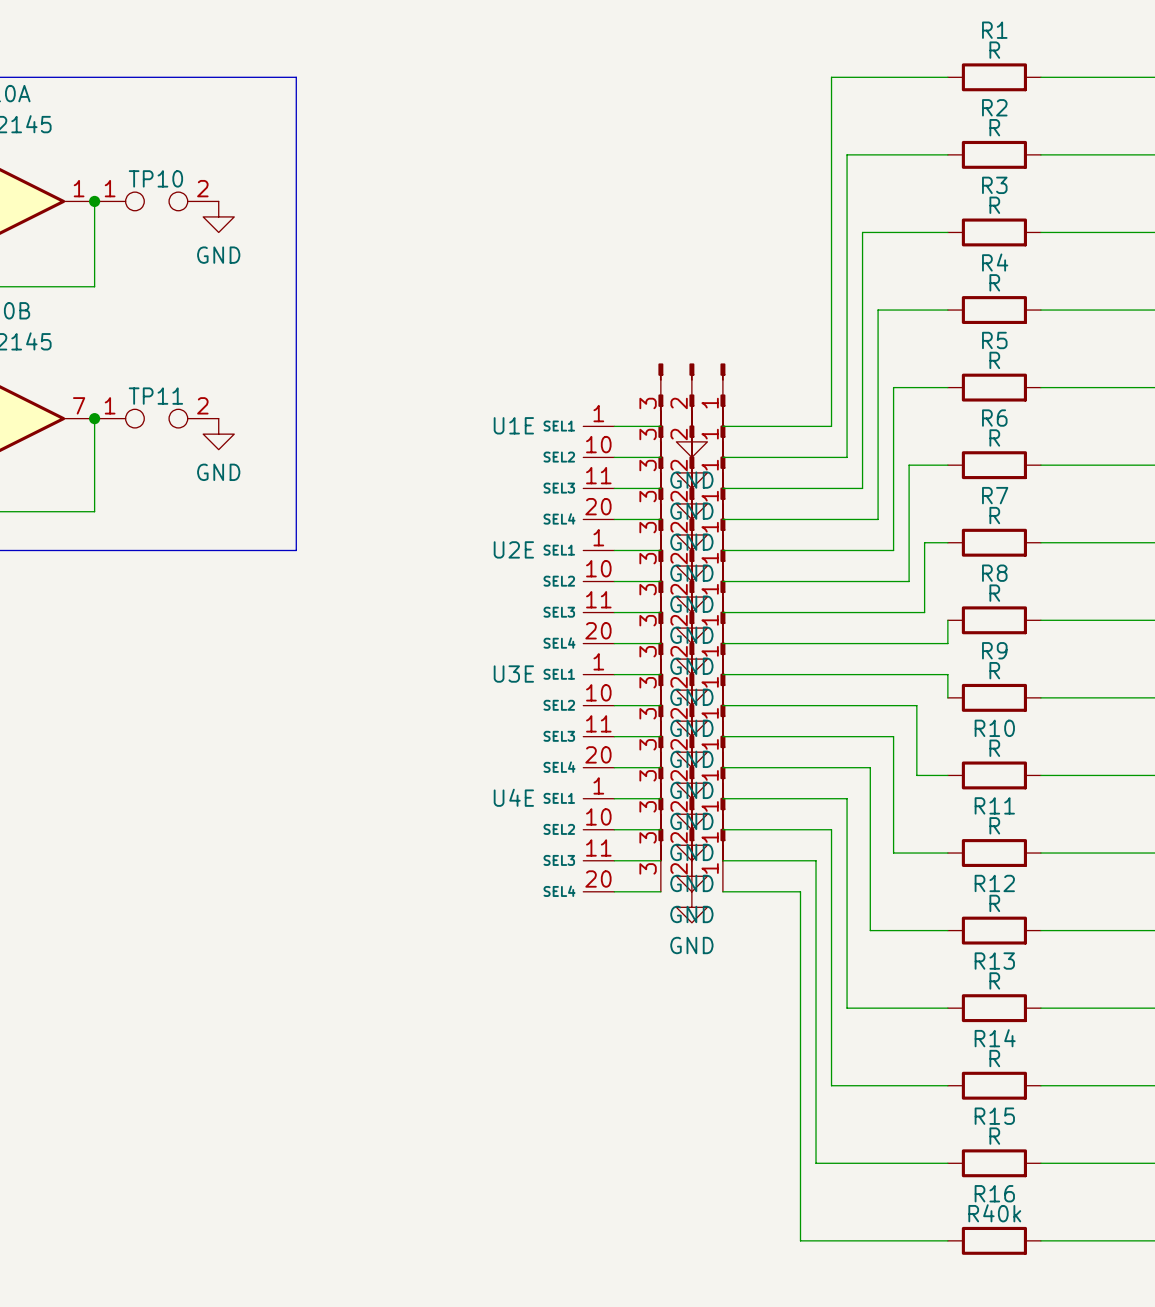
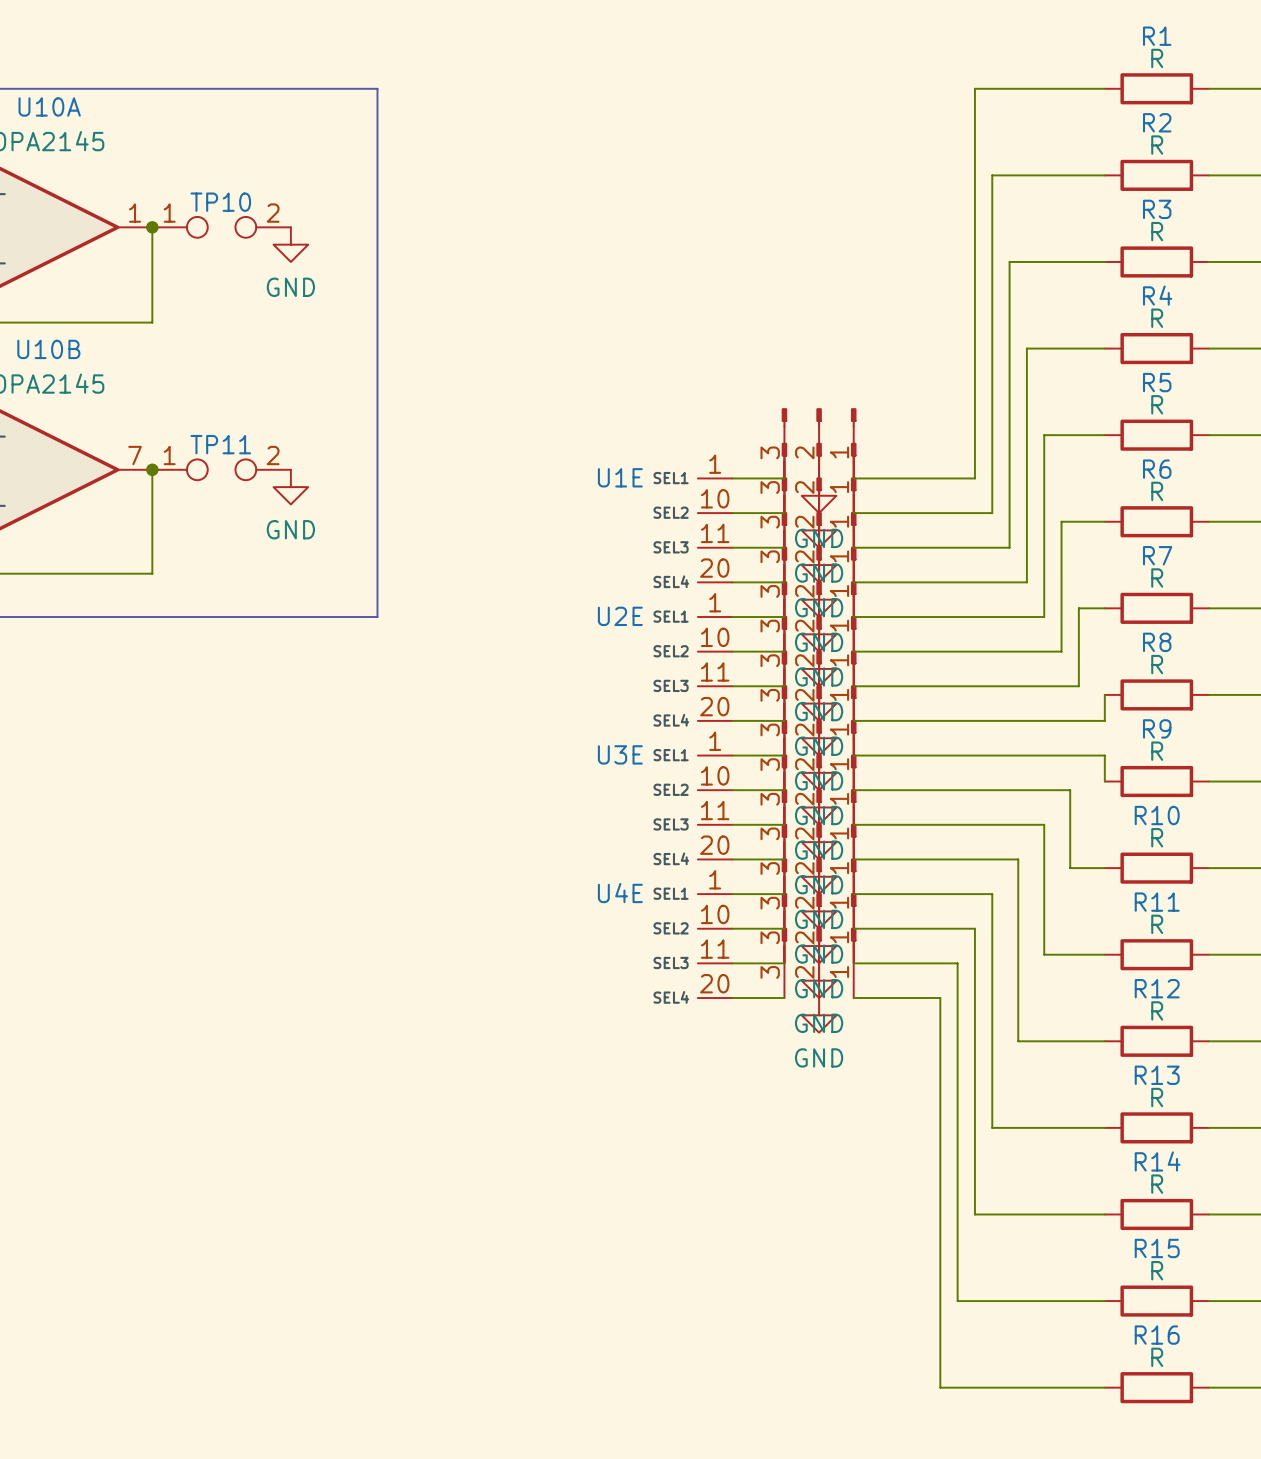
R16 value: R40k (994, 1213) -> R (1157, 1357)

